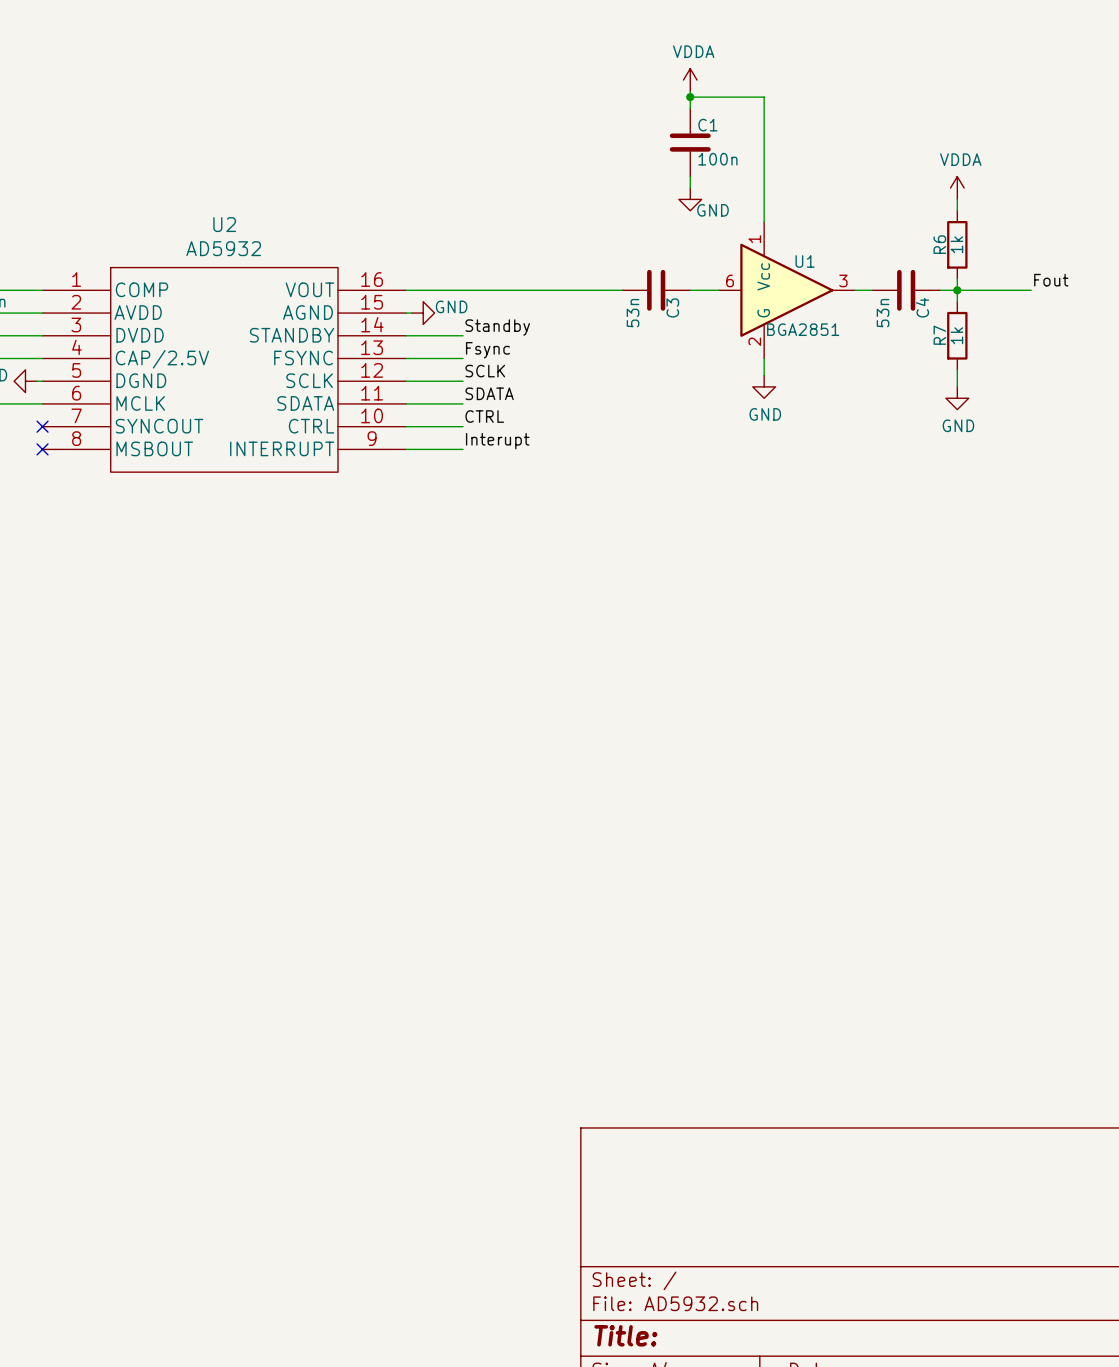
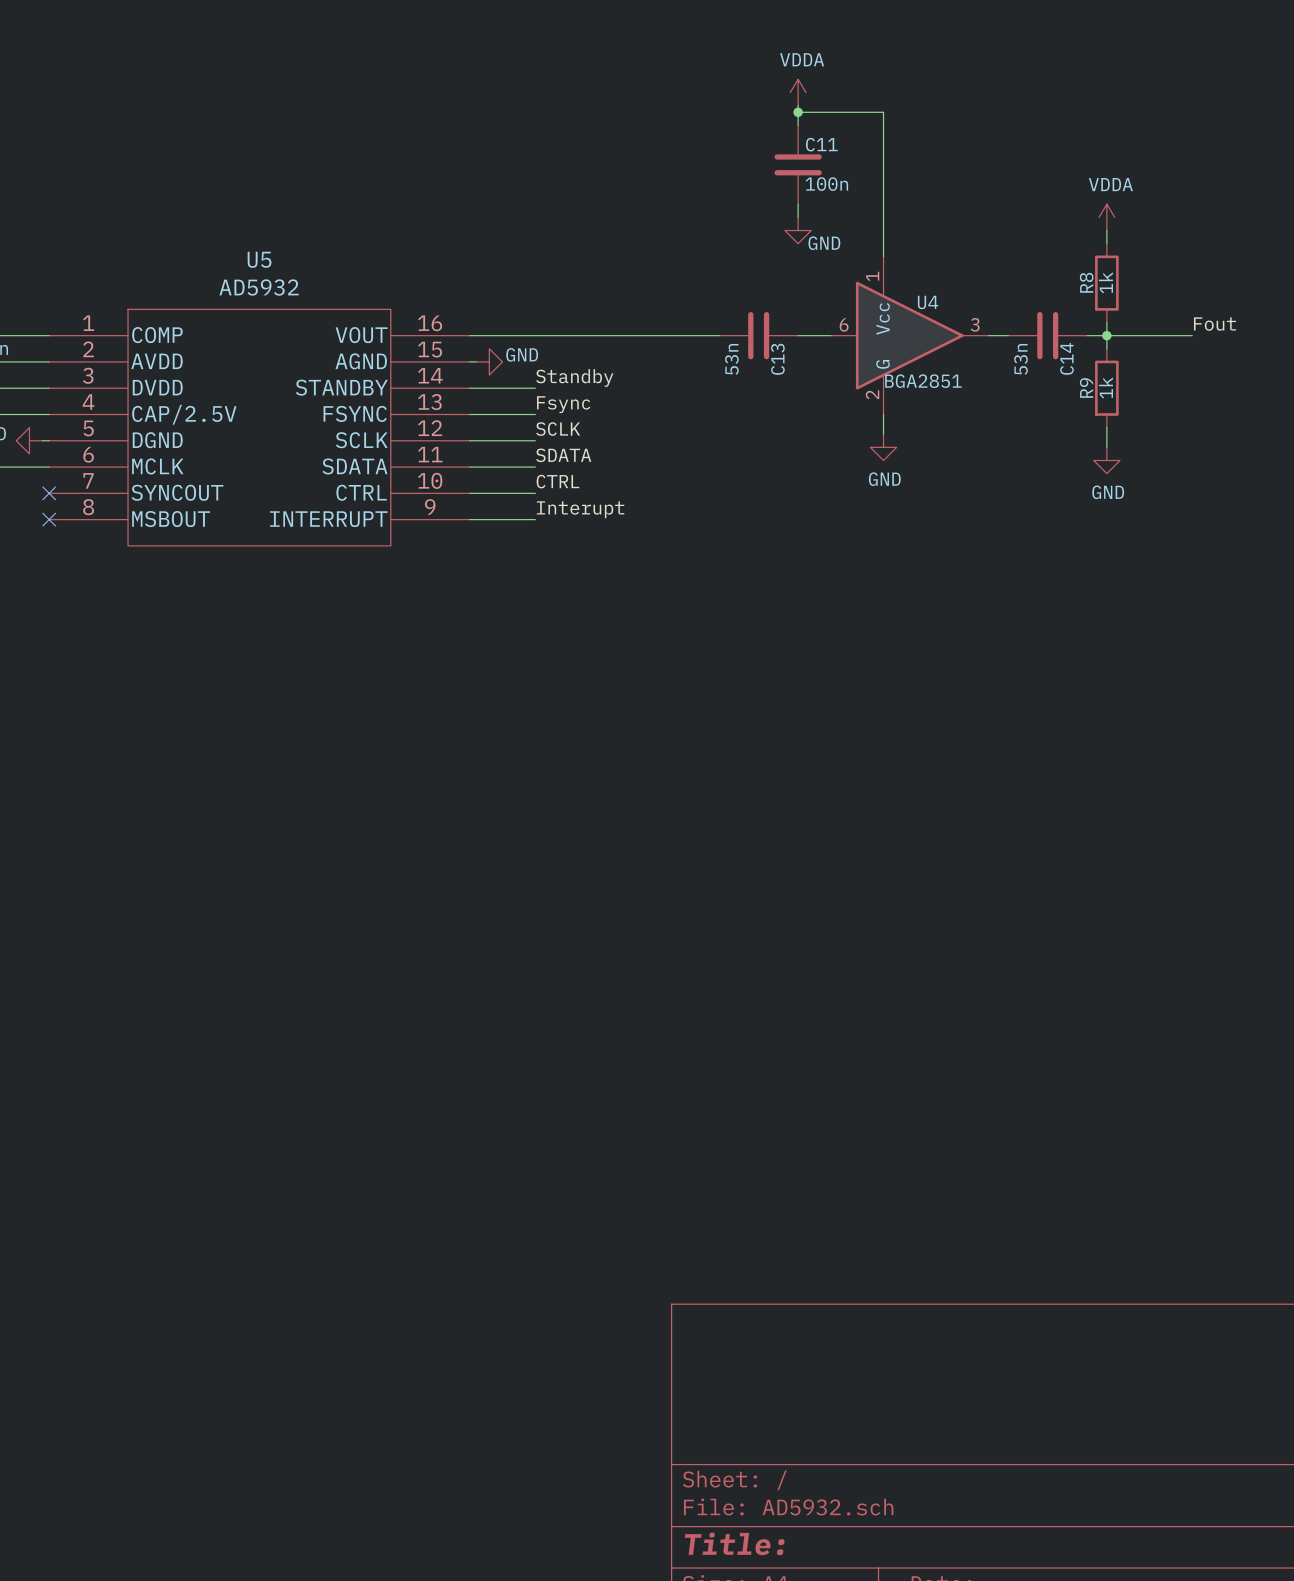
C1 name: C1 (707, 125) -> C11 (821, 144)
U2 name: U2 (224, 224) -> U5 (259, 259)
R6 name: R6 (939, 244) -> R8 (1086, 282)
U1 name: U1 (805, 261) -> U4 (928, 302)
C3 name: C3 (672, 307) -> C13 (777, 359)
C4 name: C4 (922, 307) -> C14 (1066, 358)
R7 name: R7 (939, 335) -> R9 (1086, 387)

